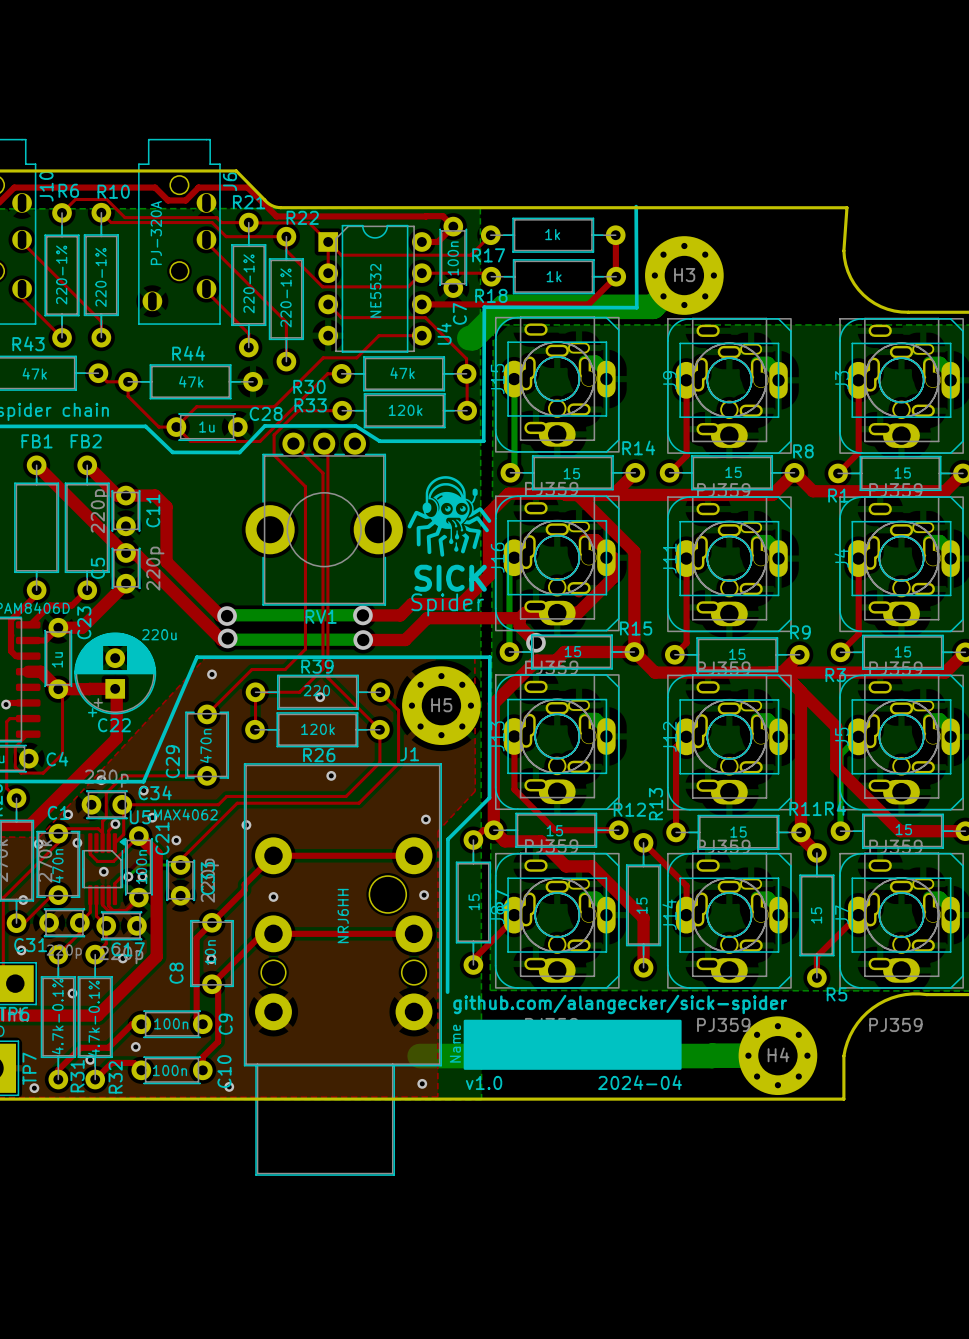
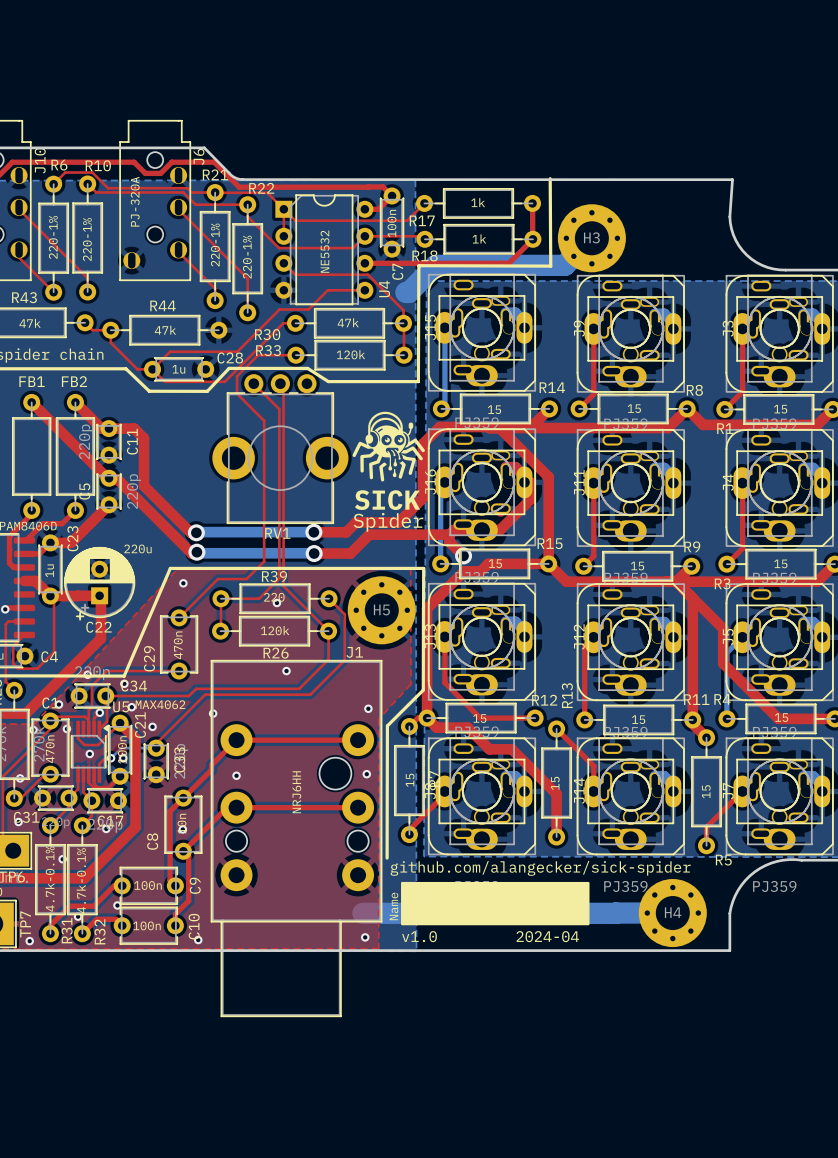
C9 footprint: [131, 1010, 213, 1039] -> [113, 866, 184, 905]
C10 footprint: [131, 1056, 213, 1085] -> [113, 906, 184, 945]

